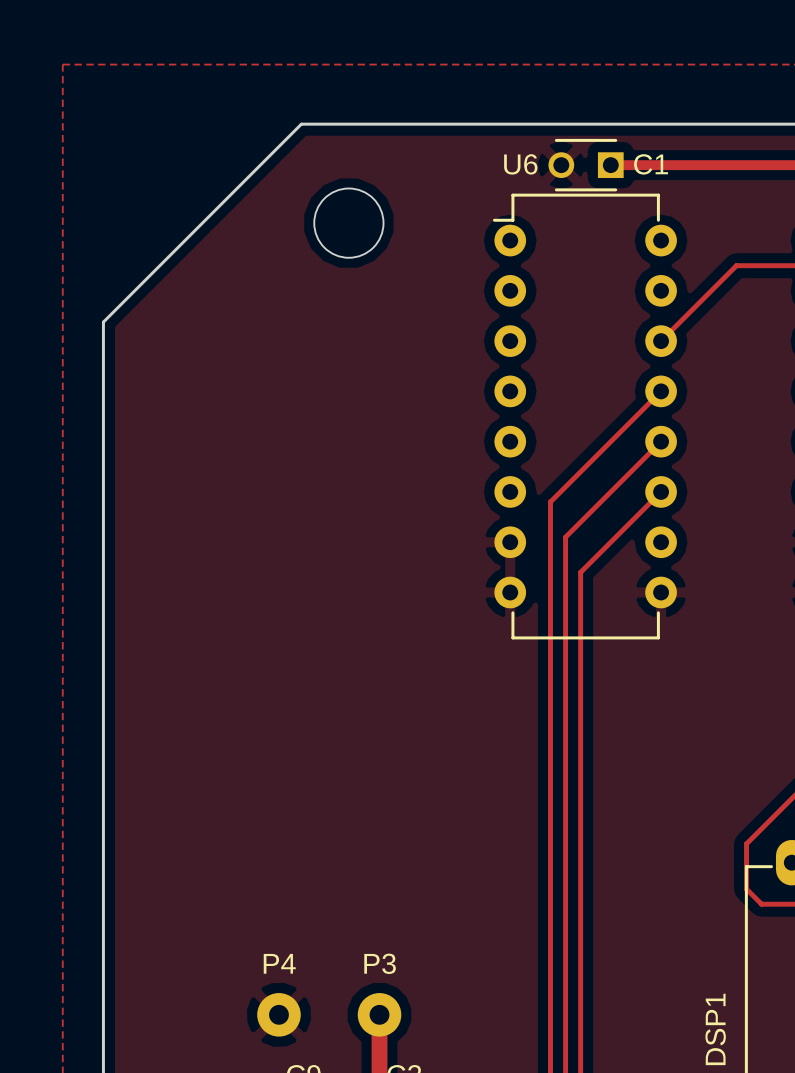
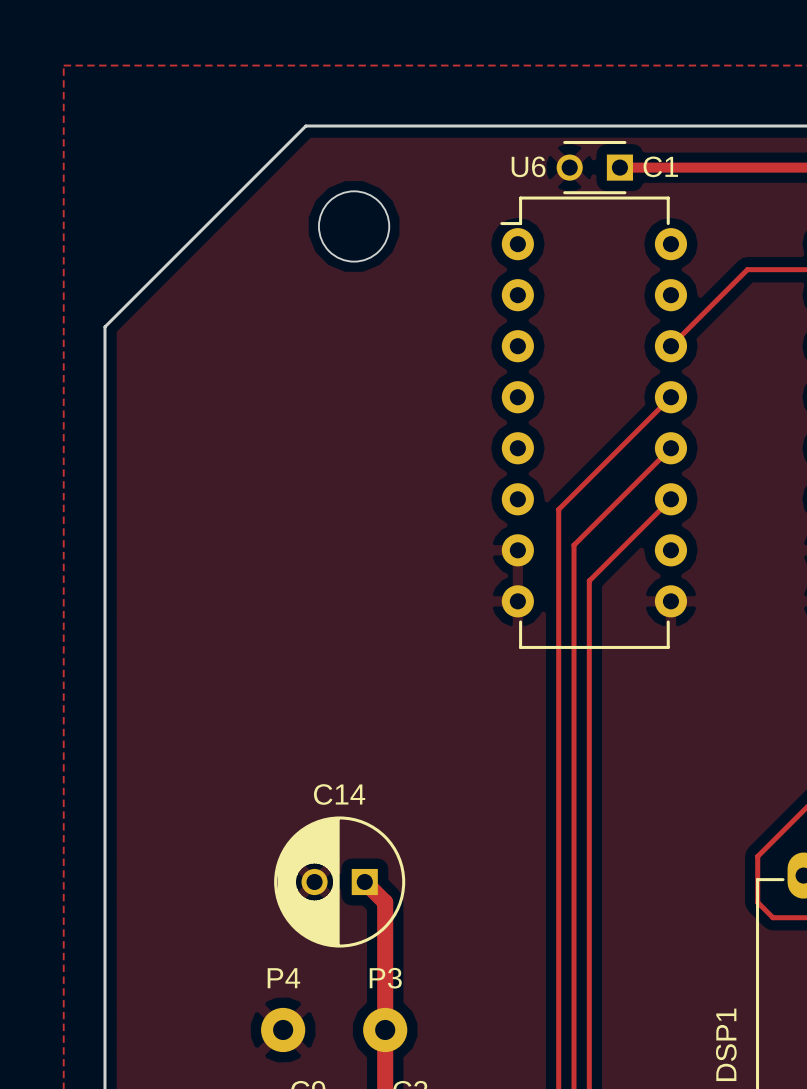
C14: none -> (339, 882)
track: none -> (364, 882) (385, 902) (385, 1029)

